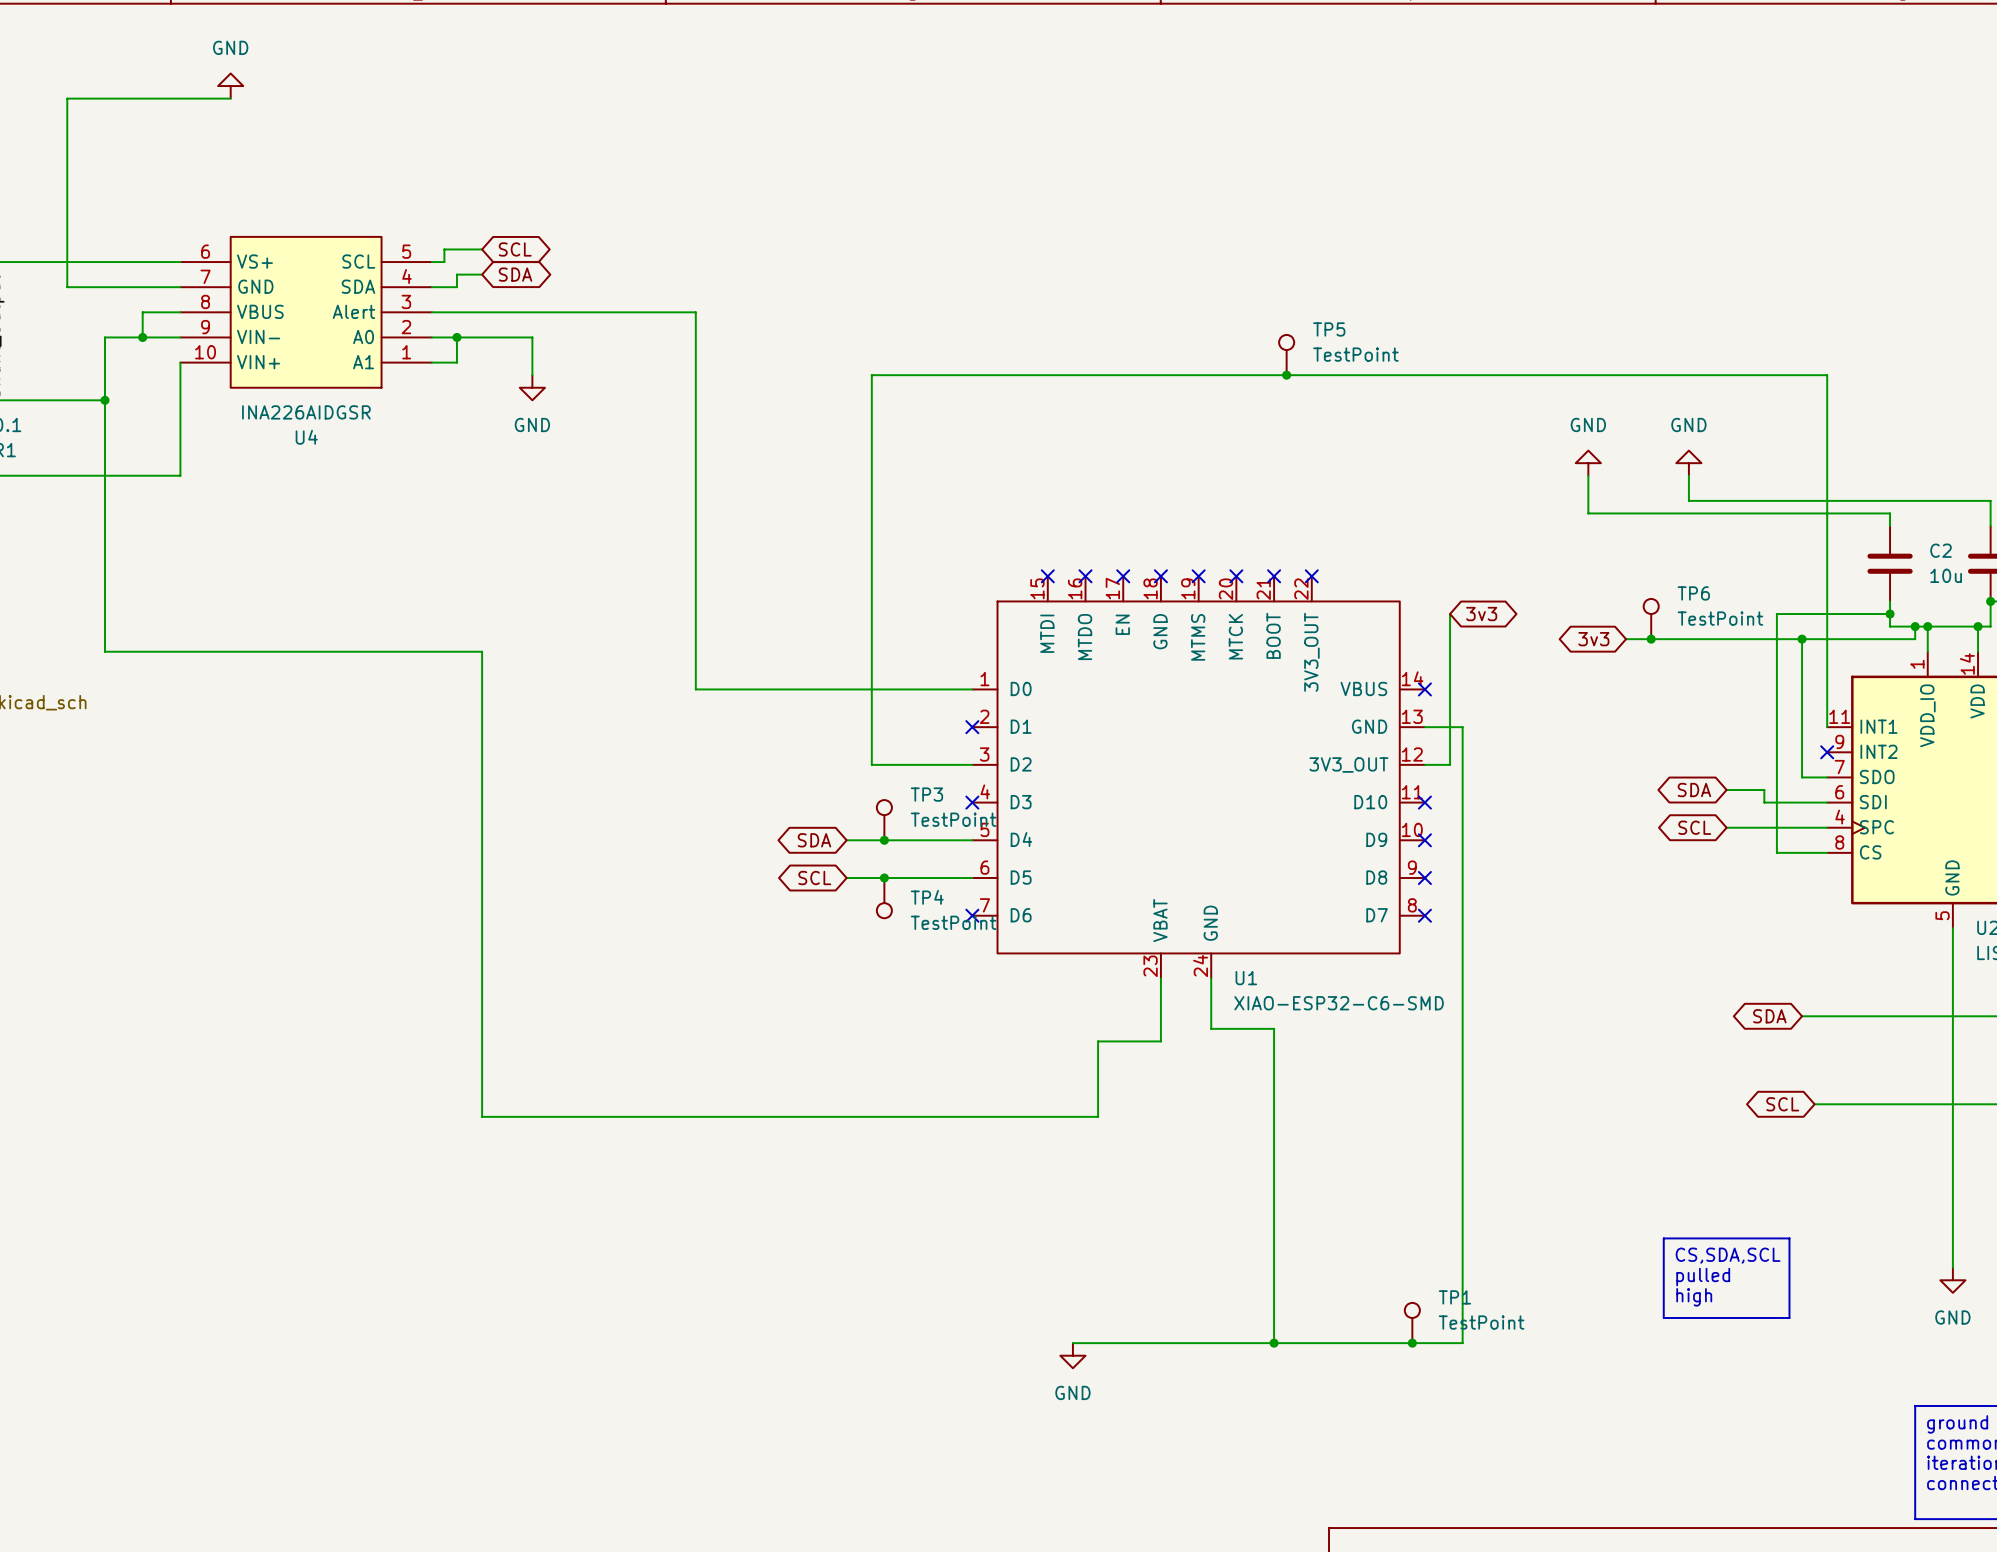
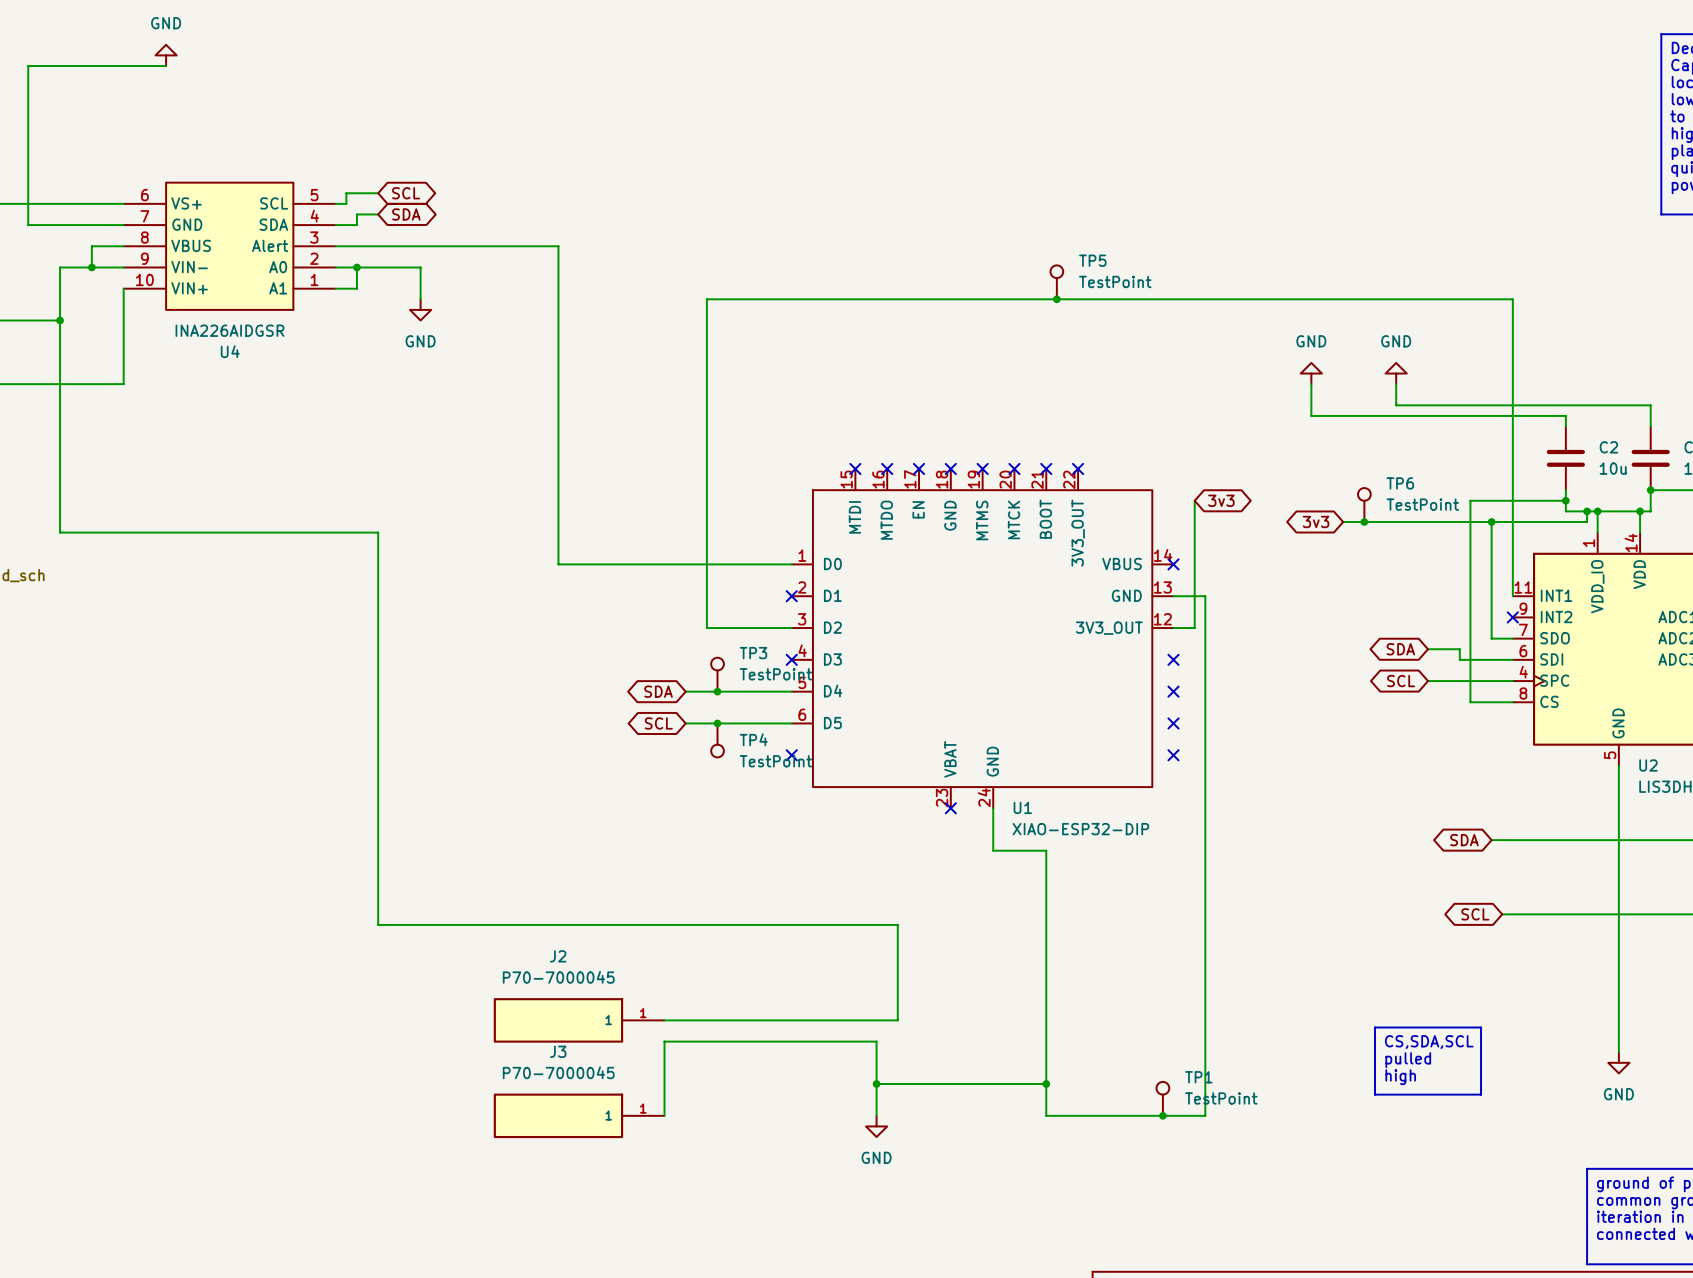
U1 symbol: [972, 576, 1425, 979] -> [791, 468, 1174, 809]
wire: (1160, 978) (1160, 1041) (1098, 1041) (1098, 1116) -> (664, 1020) (897, 1020) (897, 924)
no-connect mark: none -> (950, 808)
U1 value: XIAO-ESP32-C6-SMD (1339, 1003) -> XIAO-ESP32-DIP (1080, 829)
J2: none -> P70-7000045 (579, 1020)
wire: none -> (876, 1084) (1046, 1084)
junction: none -> (876, 1084)
J3: none -> P70-7000045 (579, 1115)
wire: (1072, 1343) (1274, 1343) -> (876, 1115) (876, 1041) (664, 1041) (664, 1115)
junction position: (1274, 1343) -> (1046, 1084)

